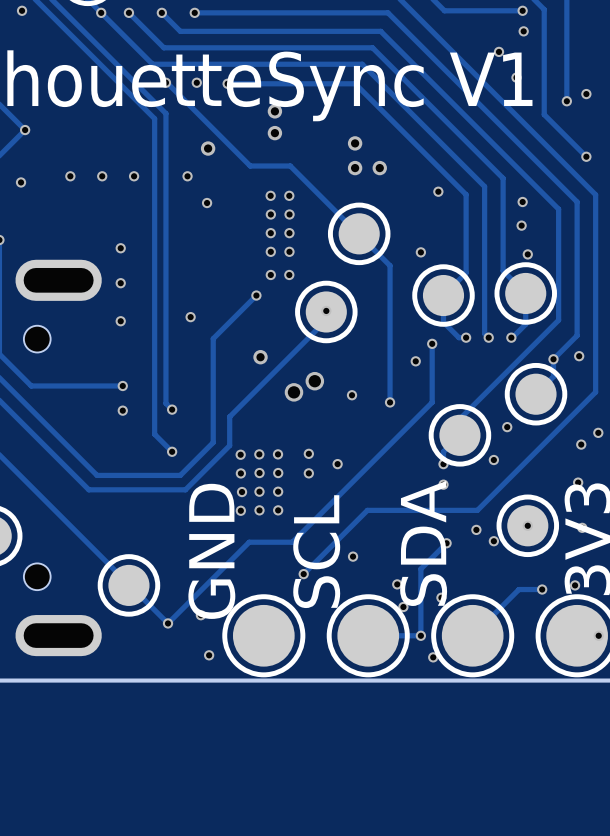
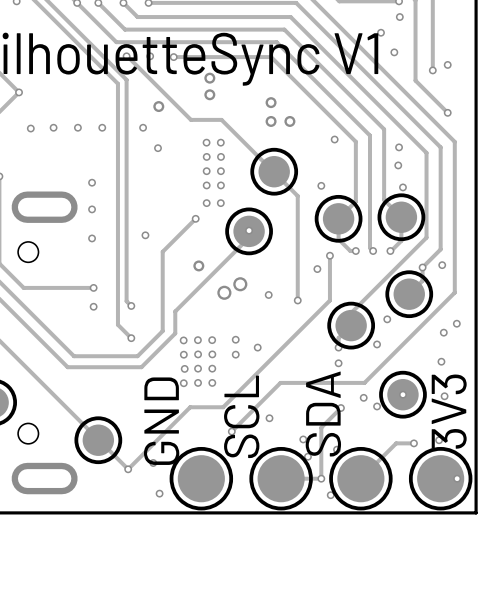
via position: (21, 182) -> (30, 128)

